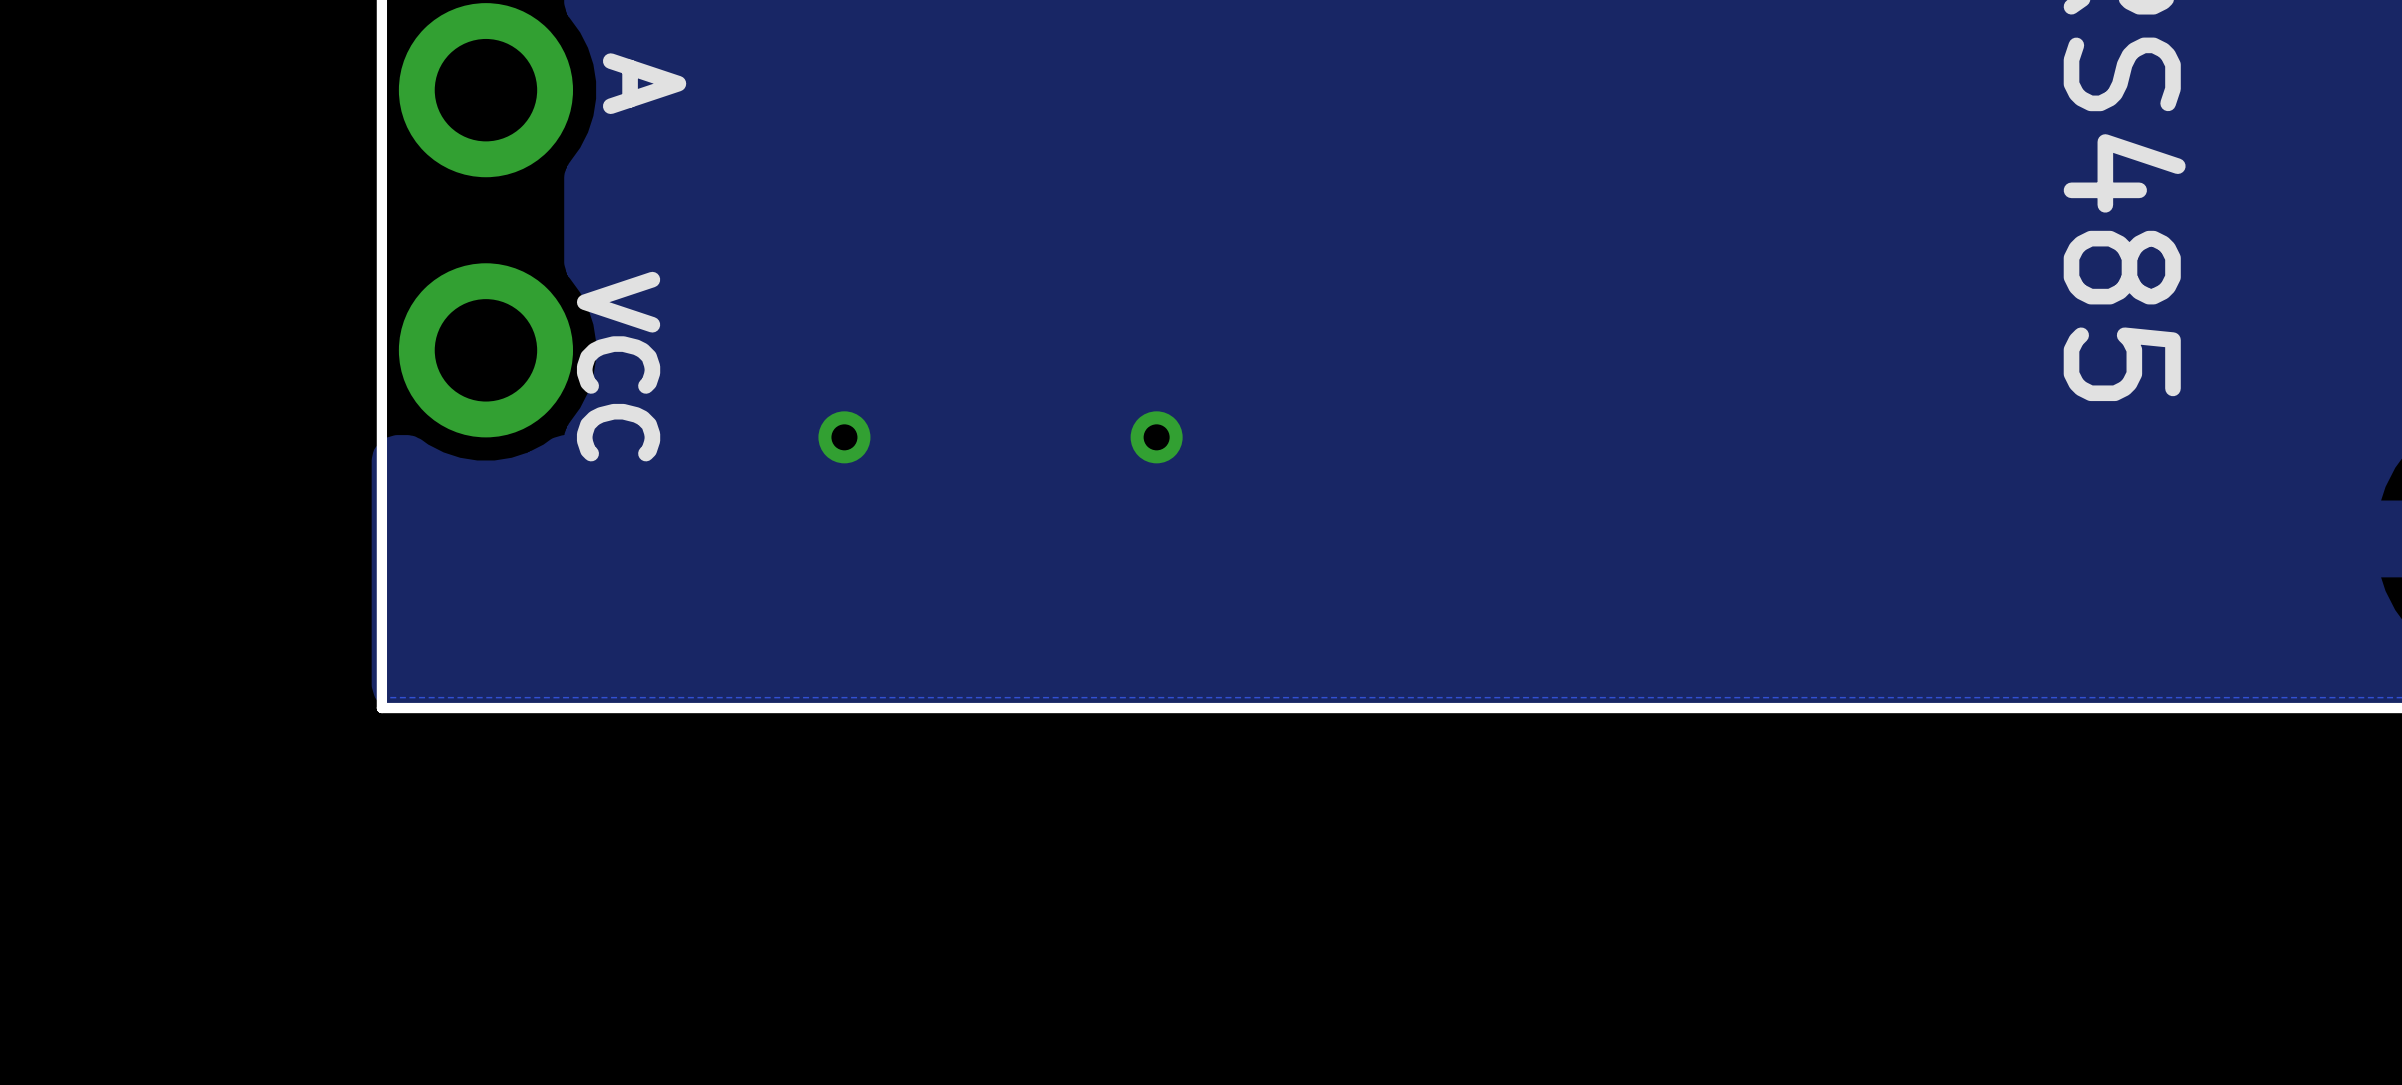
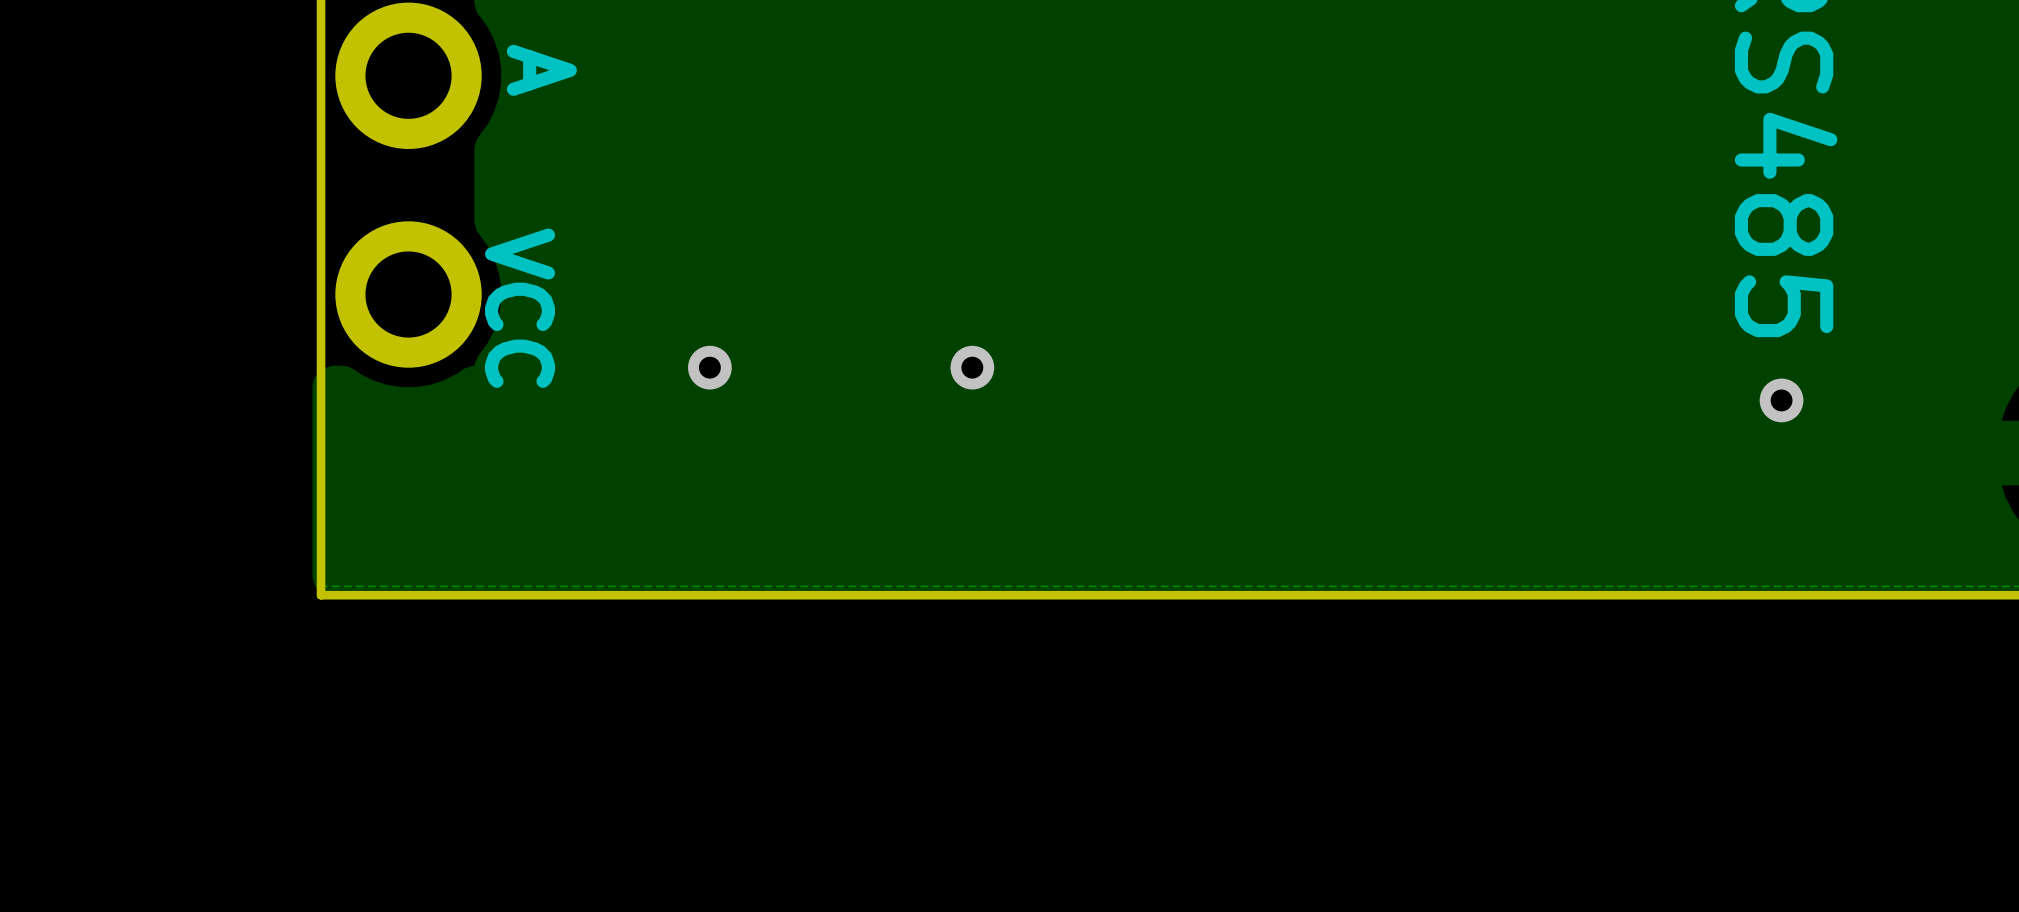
via: none -> (1781, 400)

